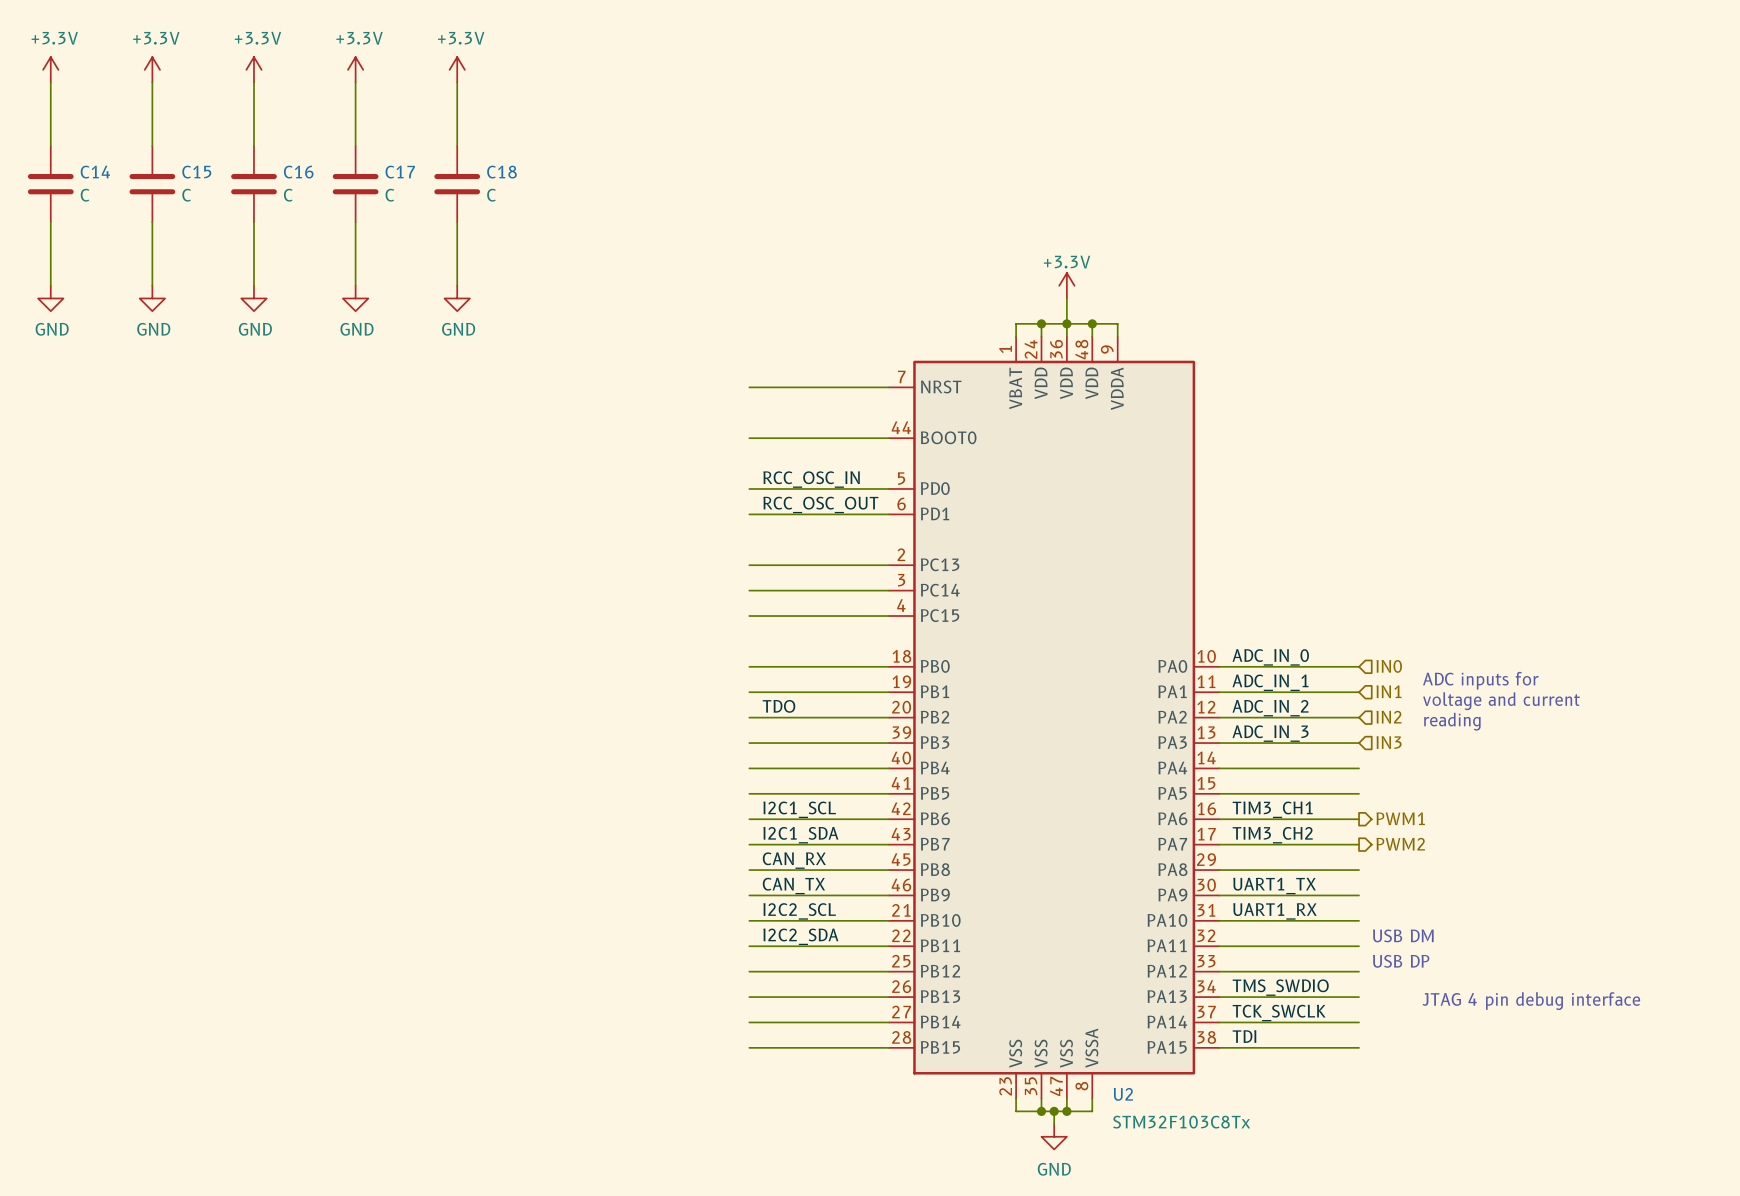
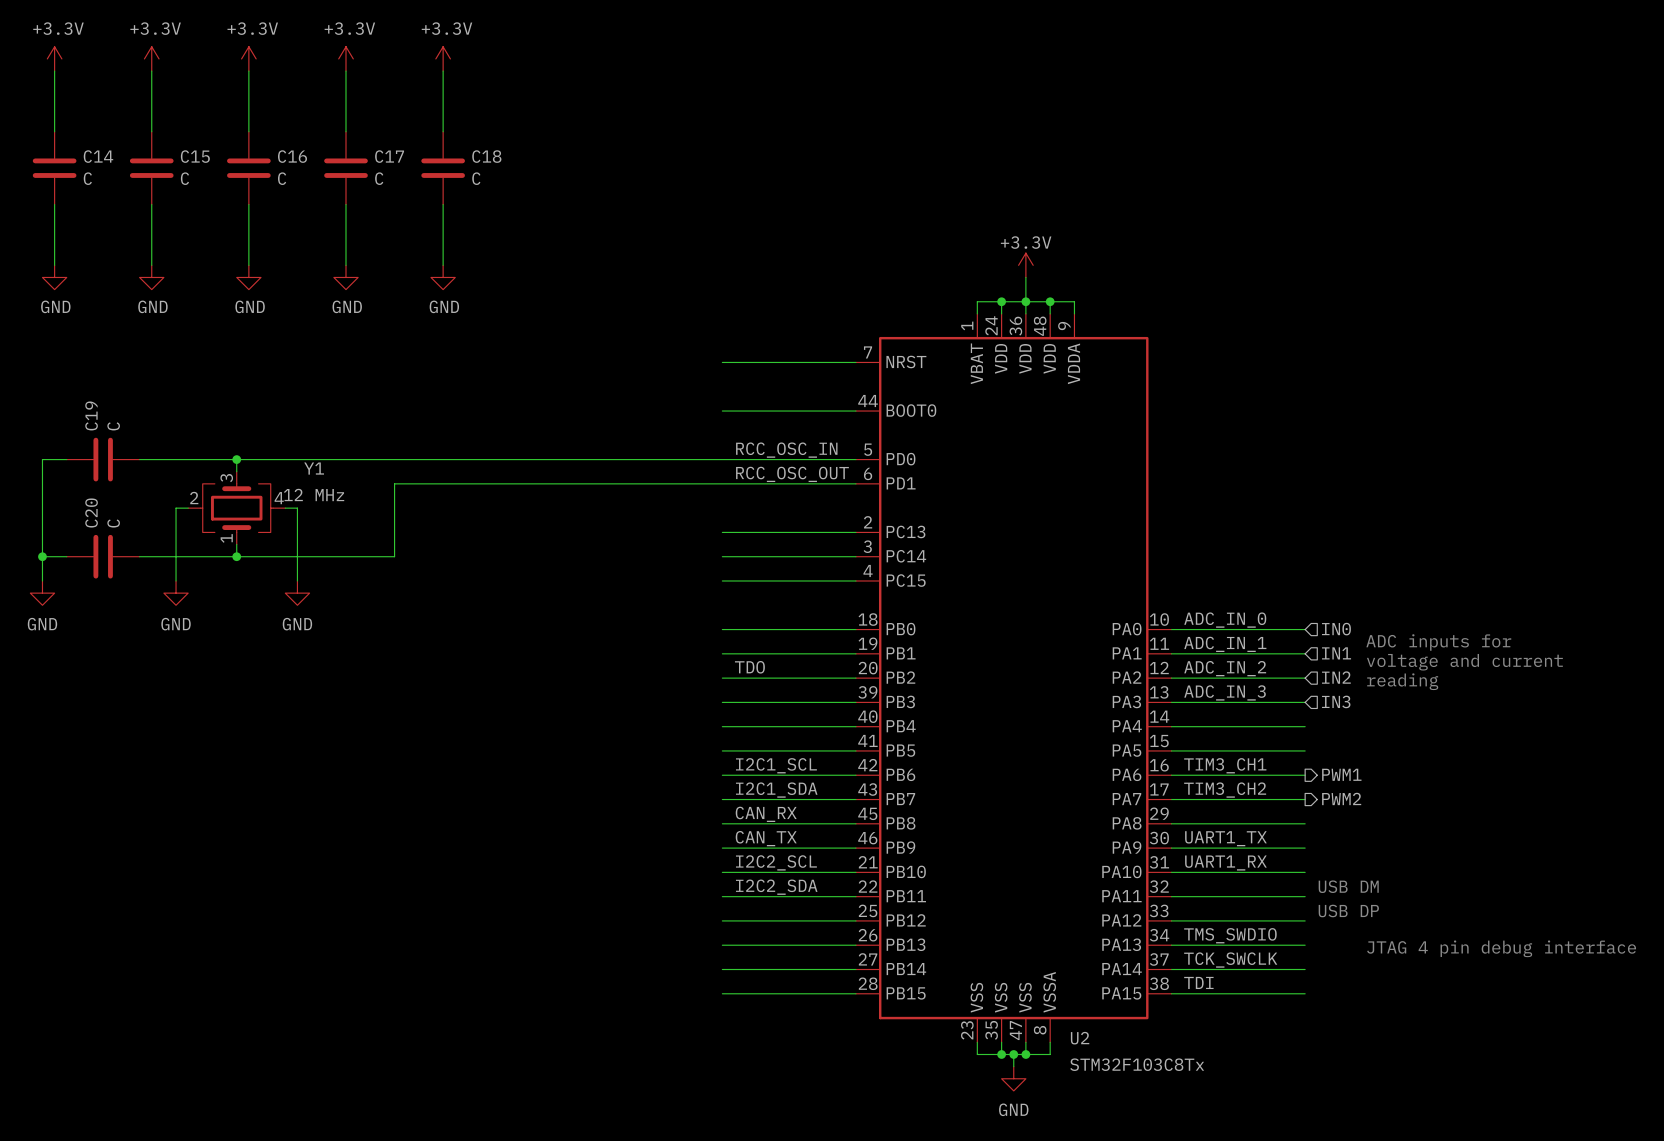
wire: none -> (66, 459) (42, 459) (42, 580)
C19: none -> C (103, 459)
wire: none -> (139, 459) (722, 459)
wire: none -> (236, 459) (236, 471)
junction: none -> (236, 459)
wire: none -> (722, 483) (394, 483) (394, 556) (139, 556)
wire: none -> (188, 508) (176, 508) (176, 580)
Y1: none -> 12 MHz (236, 508)
wire: none -> (285, 508) (297, 508) (297, 580)
wire: none -> (236, 544) (236, 556)
wire: none -> (42, 556) (66, 556)
junction: none -> (42, 556)
C20: none -> C (103, 556)
junction: none -> (236, 556)
power symbol: none -> GND (42, 593)
power symbol: none -> GND (176, 593)
power symbol: none -> GND (297, 593)

